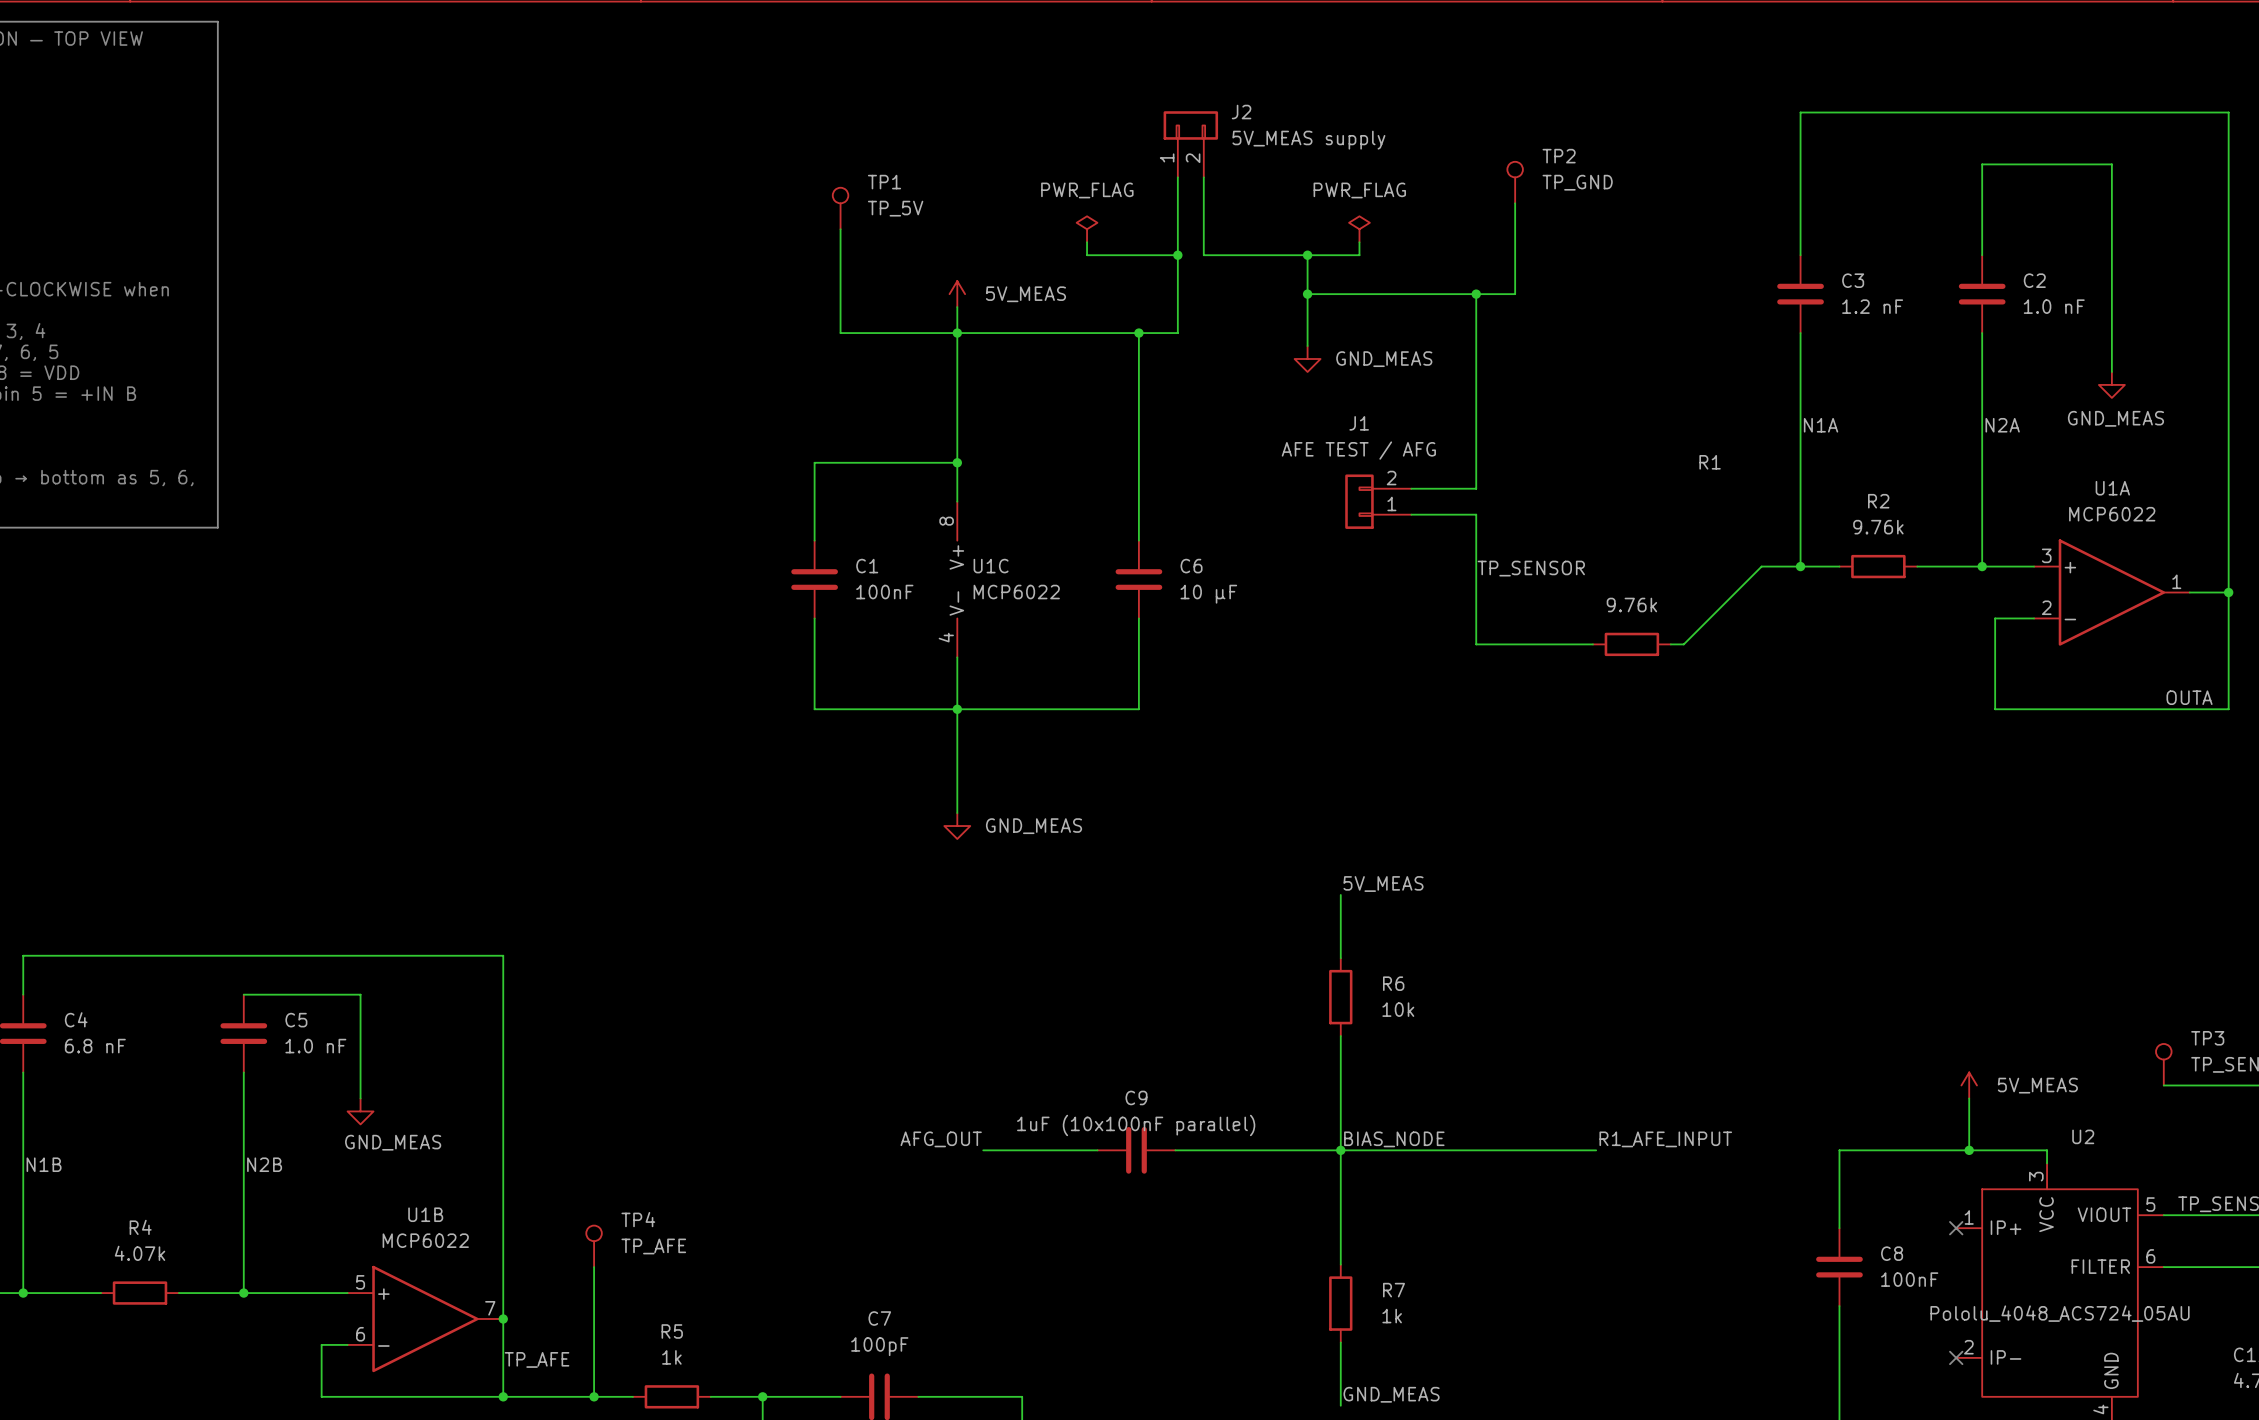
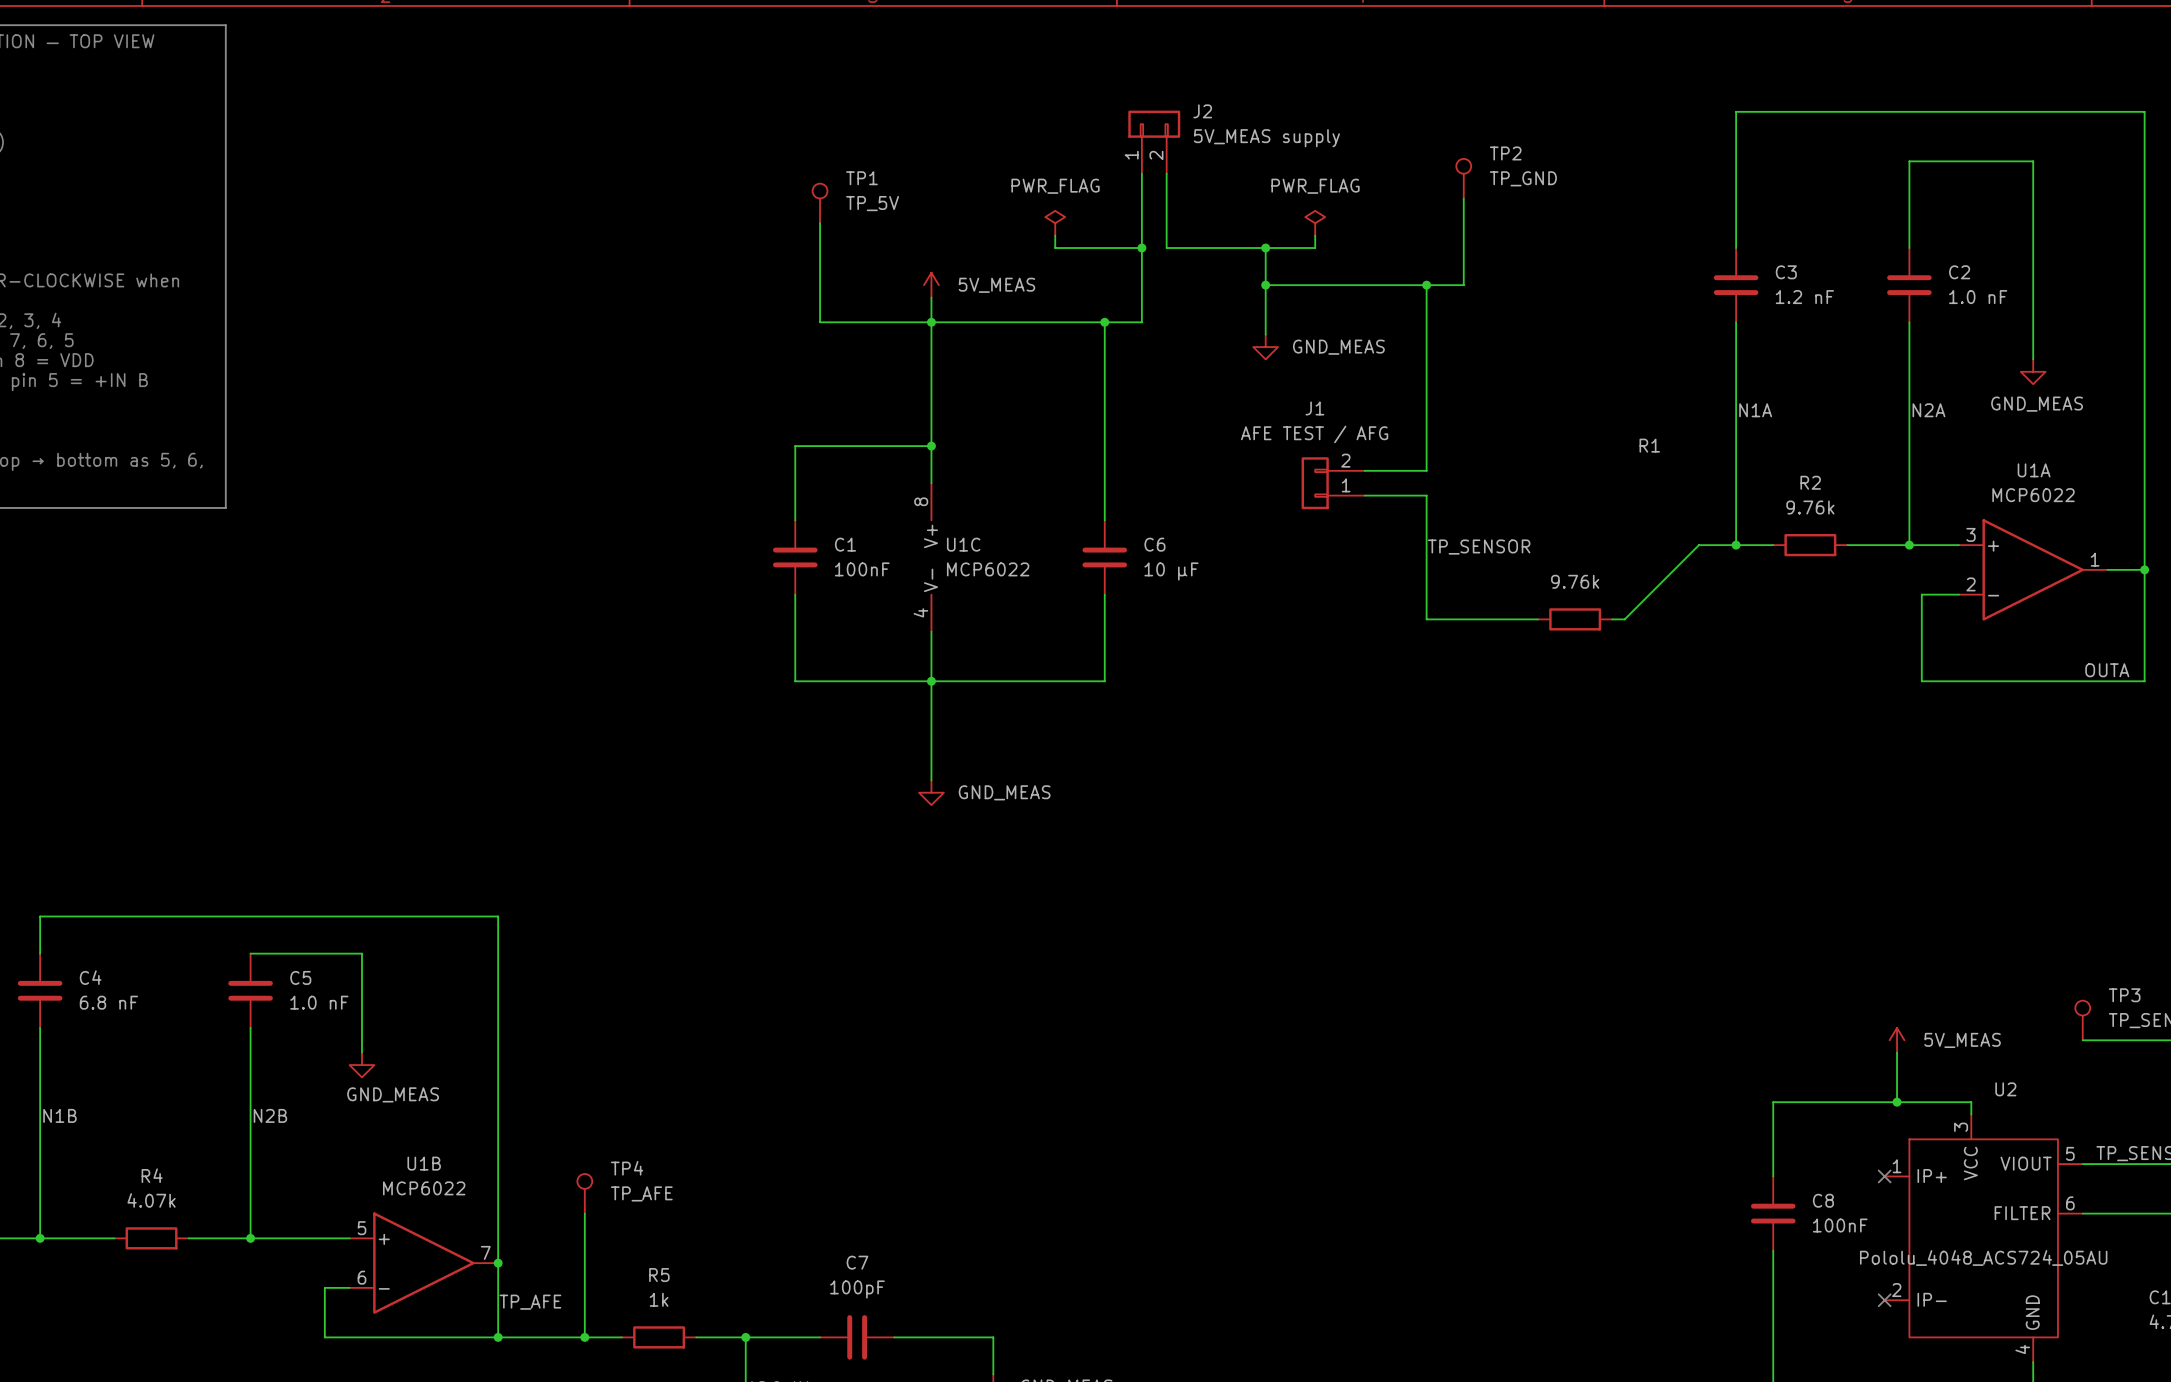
label: 5V_MEAS (1383, 884) -> none
wire: (1340, 894) (1340, 958) -> none
R6: 10k (1340, 997) -> none
wire: (1340, 1036) (1340, 1264) -> none
label: AFG_OUT (941, 1139) -> none
label: BIAS_NODE (1394, 1139) -> none
label: R1_AFE_INPUT (1665, 1139) -> none
wire: (983, 1150) (1097, 1150) -> none
C9: 1uF (10x100nF parallel) (1136, 1150) -> none
wire: (1175, 1150) (1596, 1150) -> none
junction: (1340, 1150) -> none
R7: 1k (1340, 1303) -> none
wire: (1340, 1342) (1340, 1405) -> none
label: GND_MEAS (1391, 1394) -> none

